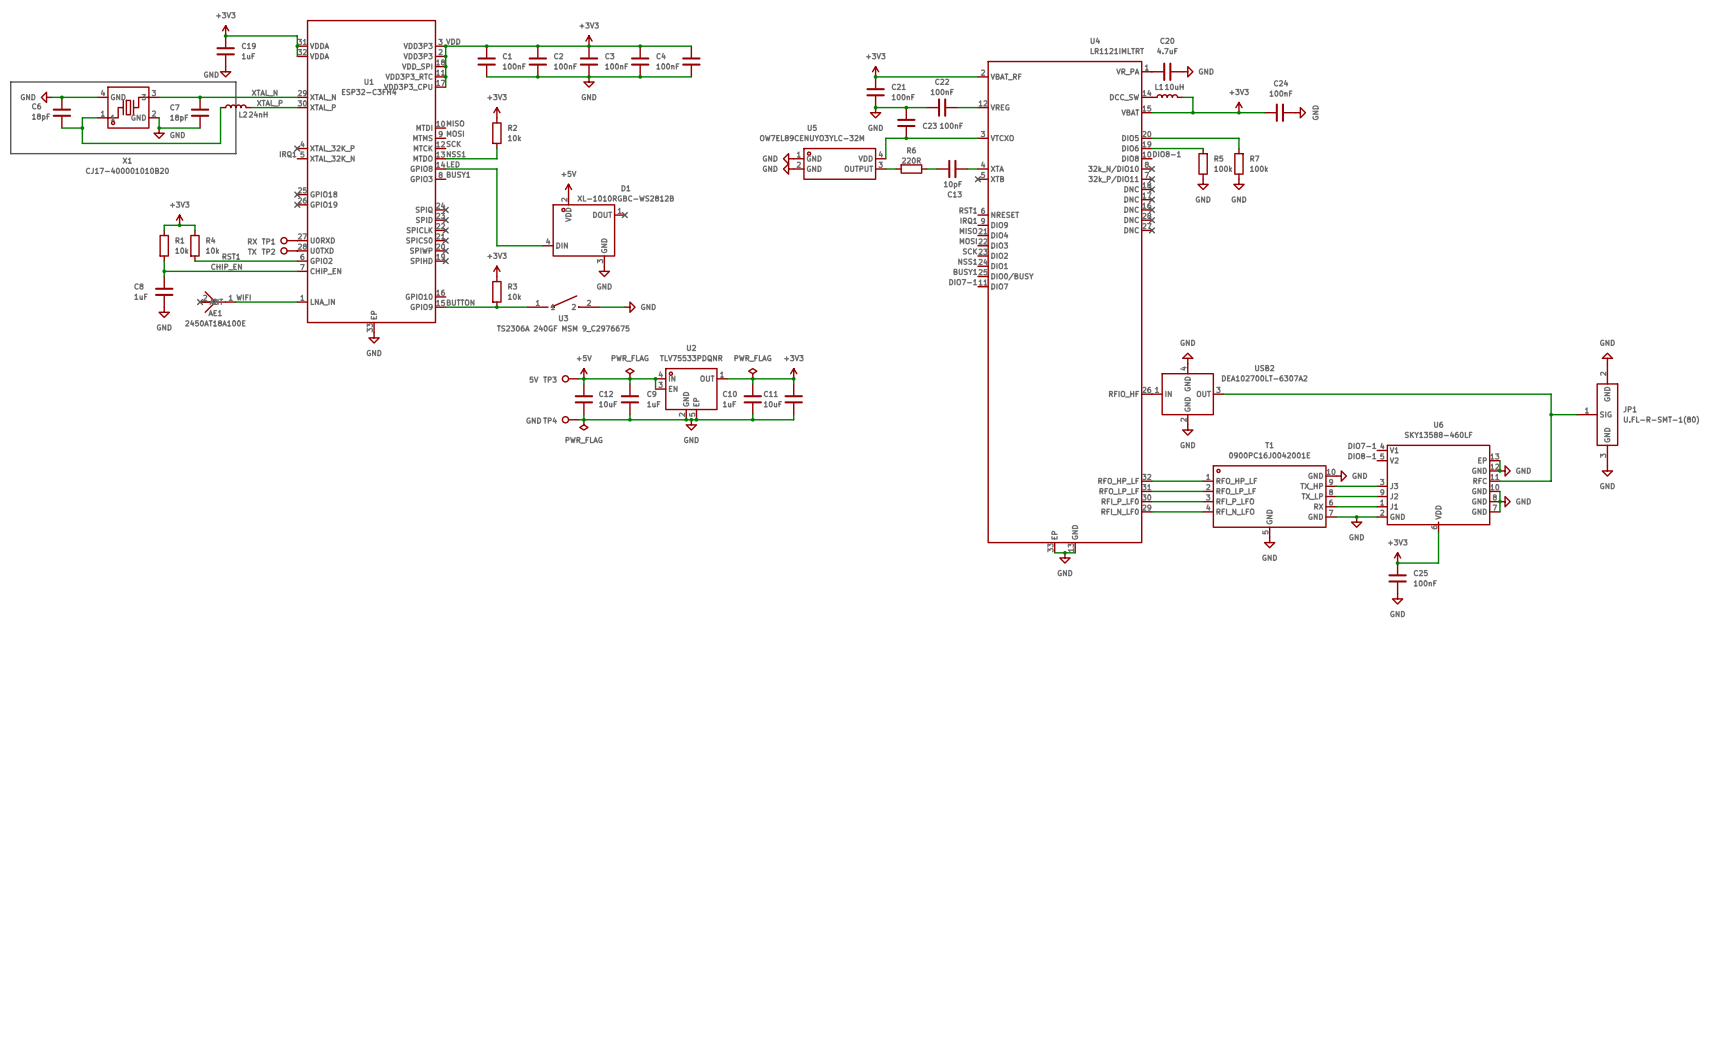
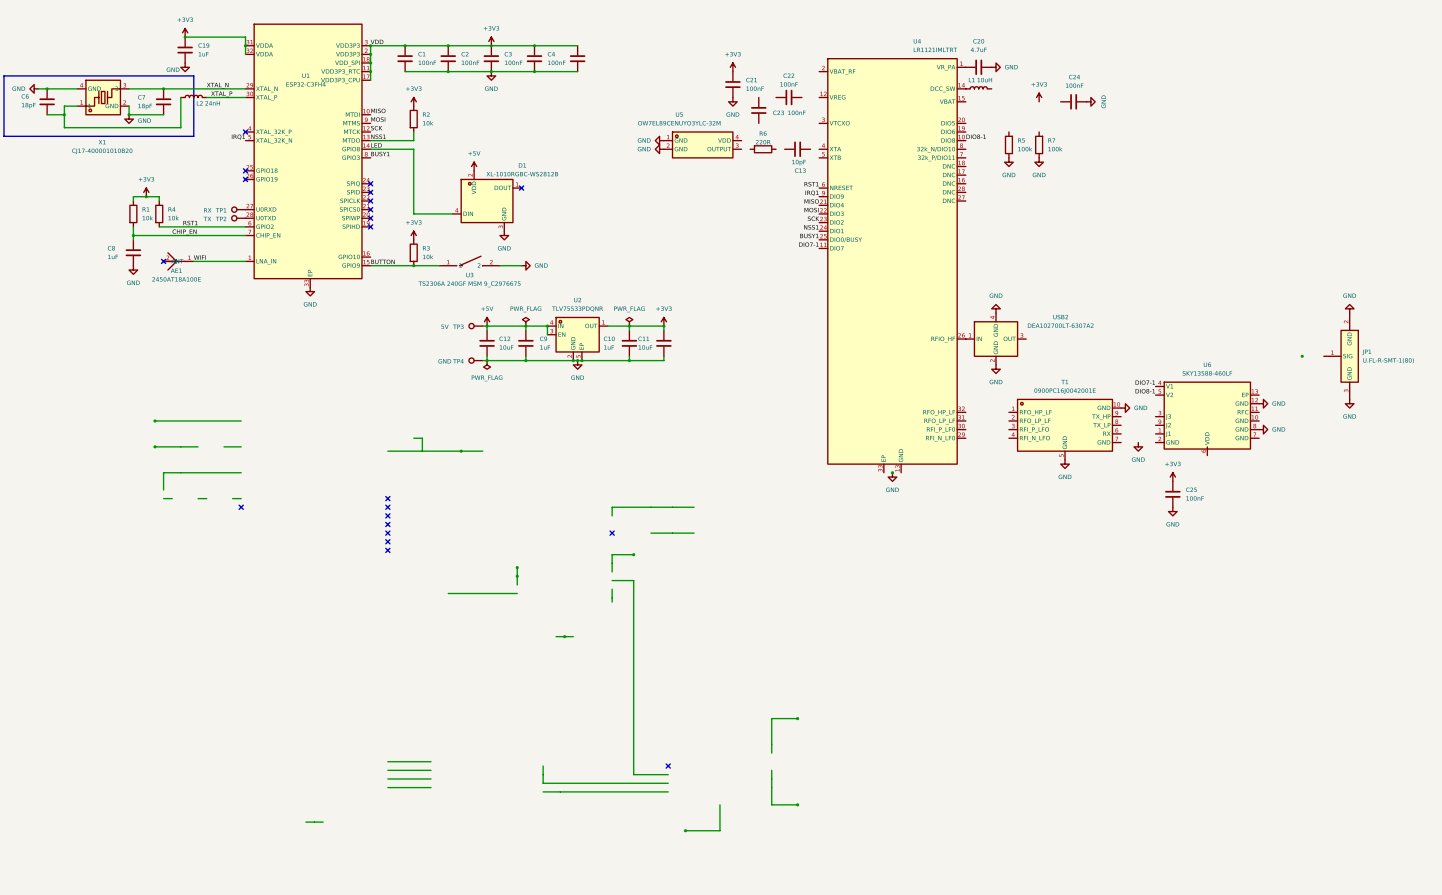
wire: (875, 76) (977, 76) -> none
junction: (875, 76) -> none
wire: (1182, 97) (1192, 97) (1192, 112) -> none
wire: (875, 107) (926, 107) -> none
junction: (875, 107) -> none
junction: (906, 107) -> none
wire: (957, 107) (977, 107) -> none
wire: (1151, 112) (1264, 112) -> none
junction: (1192, 112) -> none
junction: (1238, 112) -> none
junction: (906, 138) -> none
wire: (977, 138) (885, 138) (885, 158) -> none
wire: (1151, 138) (1238, 138) (1238, 148) -> none
wire: (1151, 148) (1203, 148) -> none
wire: (885, 169) (896, 169) -> none
wire: (926, 169) (937, 169) -> none
wire: (967, 169) (977, 169) -> none
no-connect mark: (1151, 169) -> none
no-connect mark: (977, 179) -> none
no-connect mark: (1151, 179) -> none
no-connect mark: (1151, 189) -> none
no-connect mark: (1151, 199) -> none
no-connect mark: (1151, 209) -> none
no-connect mark: (1151, 220) -> none
no-connect mark: (1151, 230) -> none
wire: (1223, 394) (1551, 394) (1551, 481) (1499, 481) -> none
wire: (1551, 414) (1576, 414) -> none
wire: (1499, 460) (1499, 470) -> none
junction: (1499, 470) -> none
wire: (1151, 481) (1203, 481) -> none
wire: (1336, 486) (1377, 486) -> none
wire: none -> (154, 420) (241, 420)
junction: none -> (154, 420)
wire: (1151, 491) (1203, 491) -> none
wire: (1499, 491) (1499, 511) -> none
wire: (1336, 496) (1377, 496) -> none
wire: (1151, 501) (1203, 501) -> none
junction: (1499, 501) -> none
wire: (1336, 506) (1377, 506) -> none
wire: none -> (413, 438) (422, 438) (422, 451)
wire: (1151, 511) (1203, 511) -> none
wire: (1336, 517) (1377, 517) -> none
junction: (1356, 517) -> none
wire: none -> (154, 446) (198, 446)
junction: none -> (154, 446)
wire: none -> (223, 446) (241, 446)
wire: none -> (387, 451) (482, 451)
junction: none -> (461, 451)
wire: (1438, 532) (1438, 563) (1397, 563) -> none
wire: none -> (241, 472) (163, 472) (163, 489)
wire: (1054, 552) (1075, 552) -> none
junction: (1397, 563) -> none
wire: none -> (163, 498) (172, 498)
wire: none -> (198, 498) (206, 498)
wire: none -> (232, 498) (241, 498)
no-connect mark: none -> (387, 498)
no-connect mark: none -> (241, 507)
no-connect mark: none -> (387, 507)
wire: none -> (694, 507) (612, 507) (612, 515)
no-connect mark: none -> (387, 515)
no-connect mark: none -> (387, 524)
no-connect mark: none -> (387, 533)
no-connect mark: none -> (612, 533)
wire: none -> (650, 533) (694, 533)
no-connect mark: none -> (387, 541)
no-connect mark: none -> (387, 550)
wire: none -> (633, 554) (612, 554) (612, 571)
junction: none -> (633, 554)
wire: none -> (517, 567) (517, 584)
junction: none -> (517, 567)
junction: none -> (517, 576)
wire: none -> (612, 580) (633, 580) (633, 774) (668, 774)
wire: none -> (612, 589) (612, 602)
wire: none -> (448, 593) (517, 593)
wire: none -> (556, 636) (573, 636)
junction: none -> (564, 636)
wire: none -> (797, 718) (771, 718) (771, 753)
junction: none -> (797, 718)
wire: none -> (387, 761) (430, 761)
wire: none -> (543, 766) (543, 783) (668, 783)
no-connect mark: none -> (668, 766)
wire: none -> (387, 770) (430, 770)
wire: none -> (771, 770) (771, 804) (797, 804)
wire: none -> (387, 778) (430, 778)
wire: none -> (387, 787) (430, 787)
wire: none -> (543, 791) (668, 791)
wire: none -> (719, 804) (719, 830) (685, 830)
junction: none -> (797, 804)
wire: none -> (305, 822) (323, 822)
junction: none -> (685, 830)

